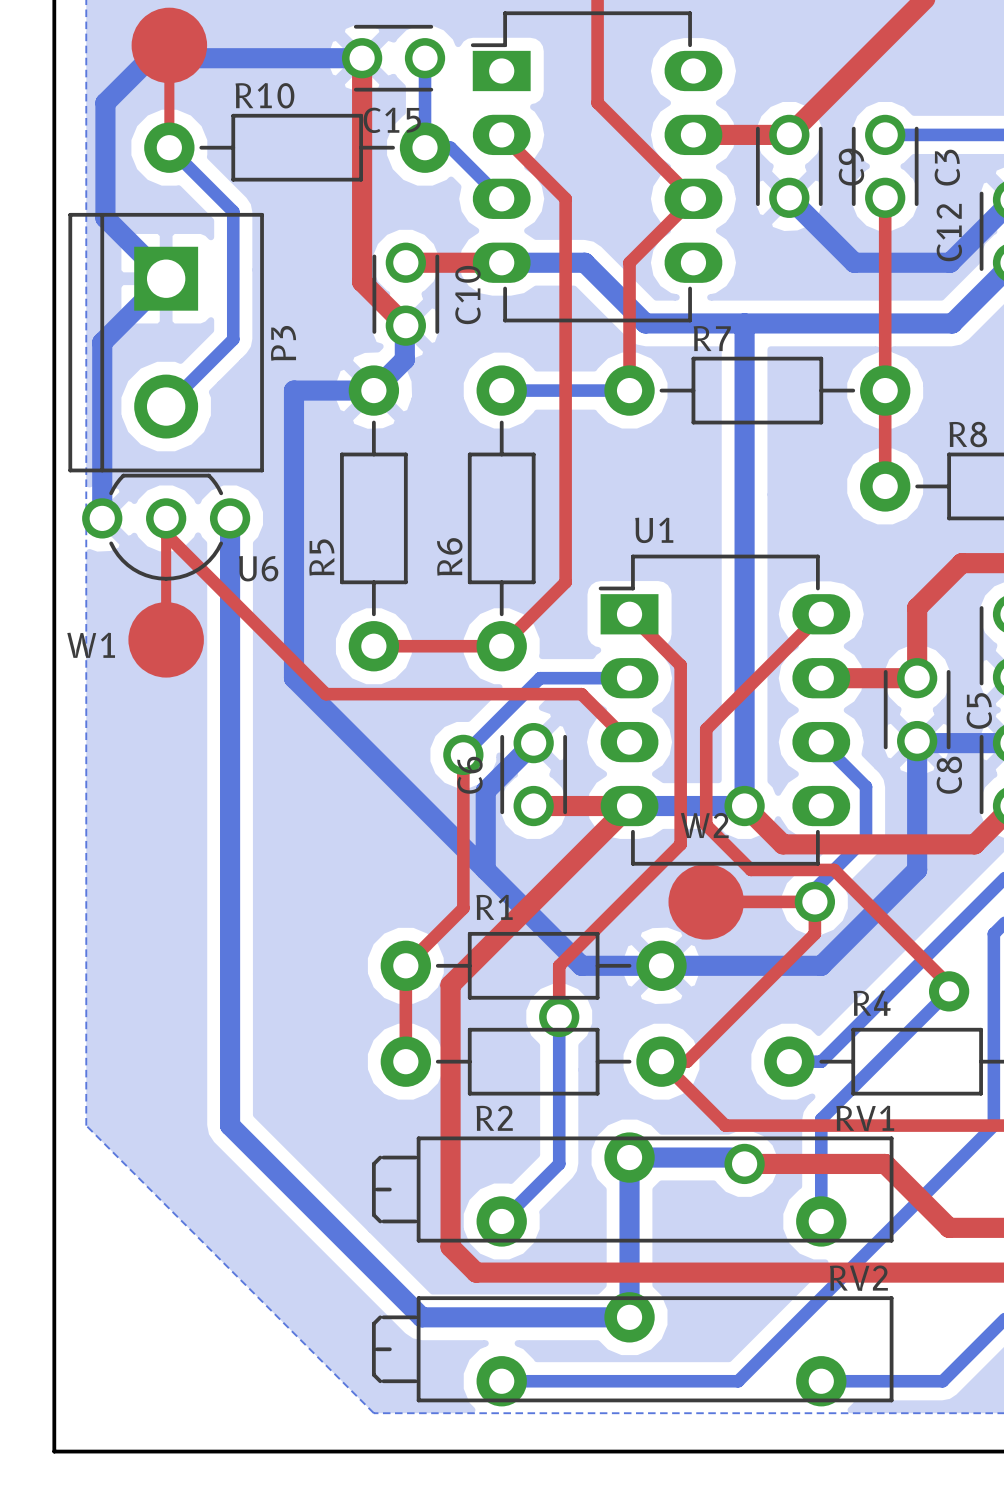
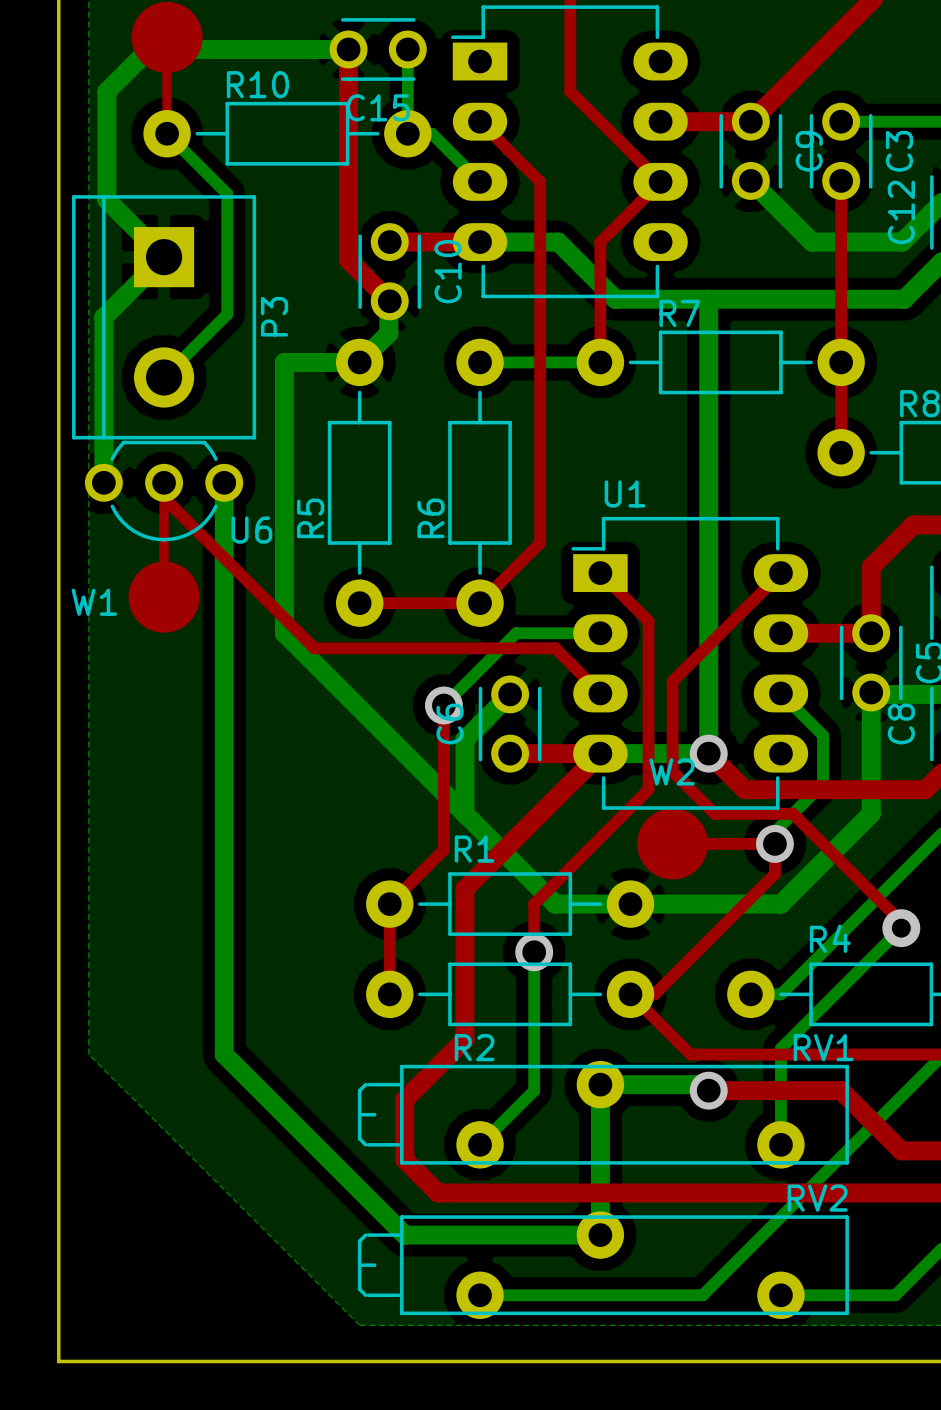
top track: (485, 949) (450, 984) (450, 1247) (476, 1272) -> (464, 889) (464, 1039) (404, 1099) (404, 1159) (437, 1192) (455, 1192)

